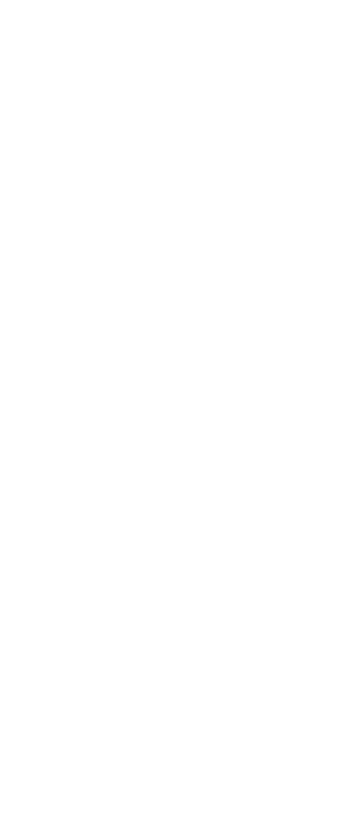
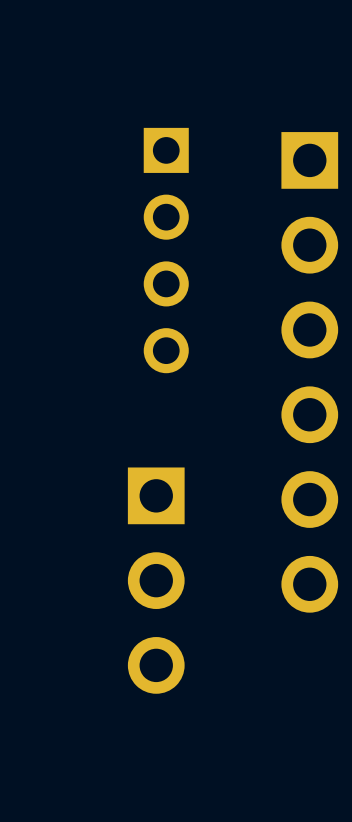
part: none -> (166, 250)
part: none -> (309, 372)
part: none -> (156, 580)

